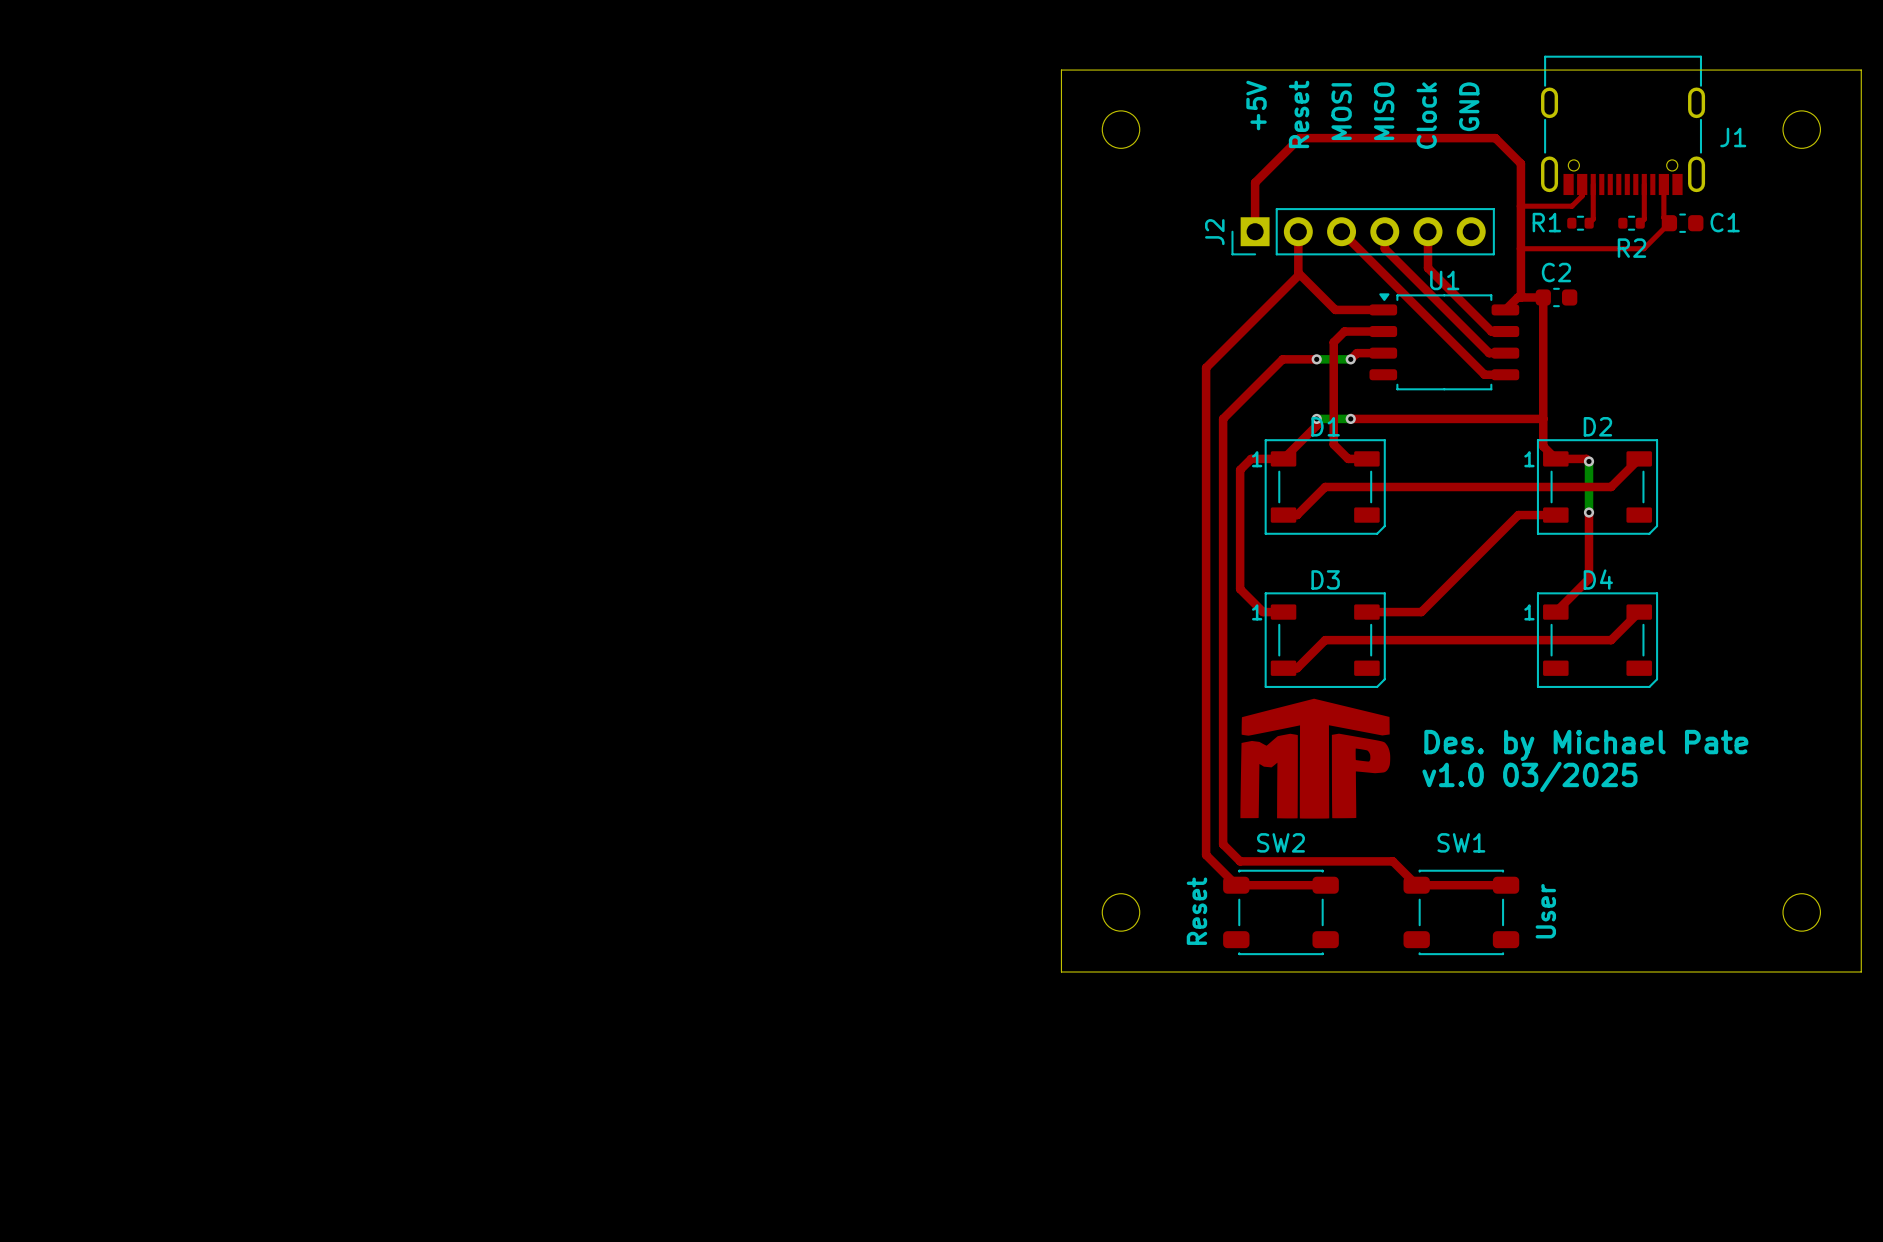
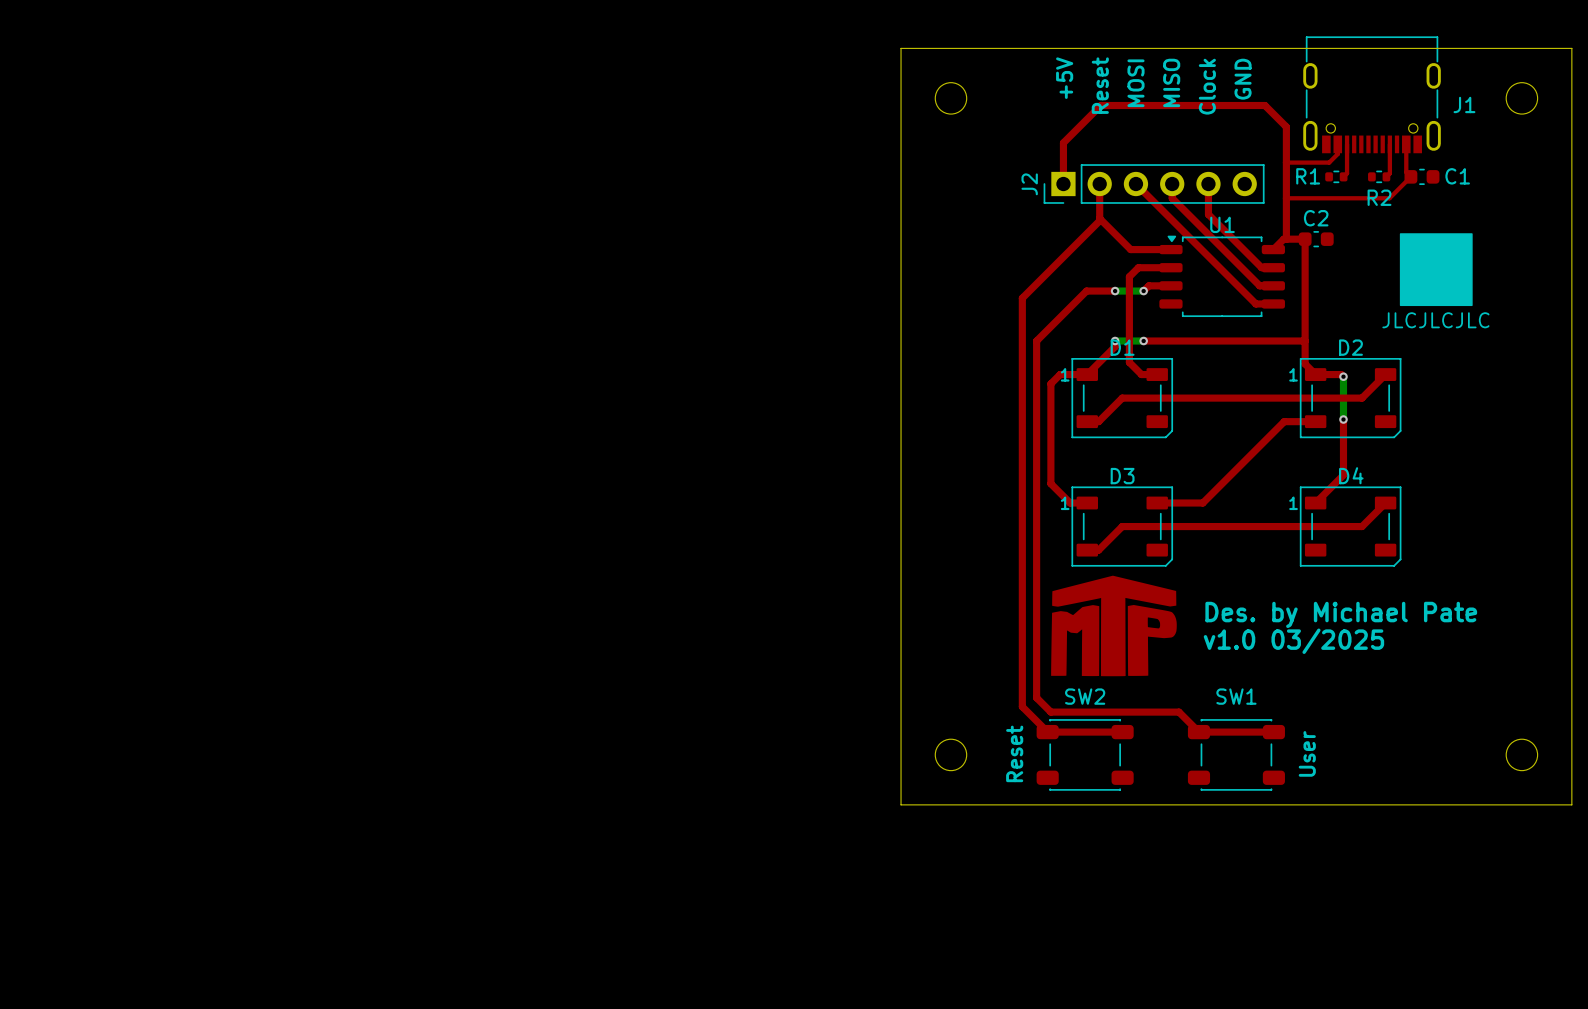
drawing: none -> [1399, 233, 1473, 307]
text: none -> JLCJLCJLC (1435, 320)

